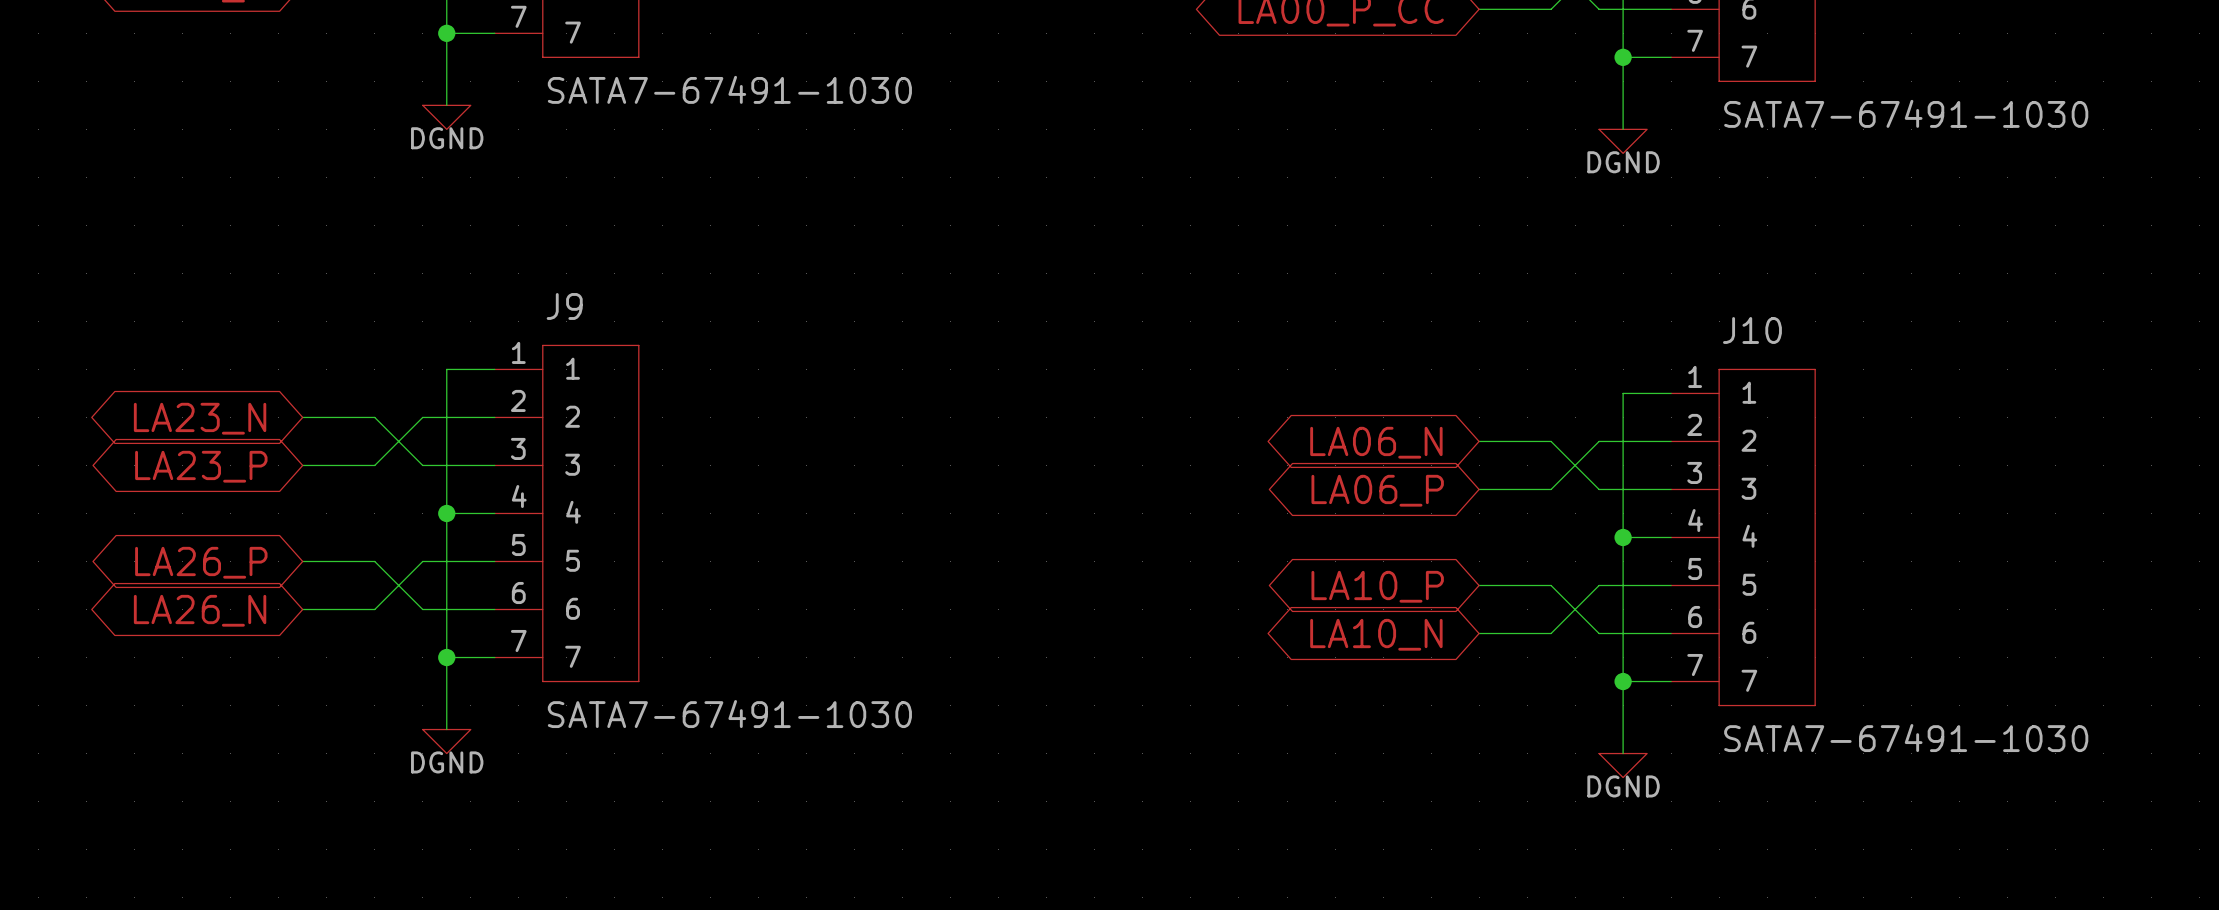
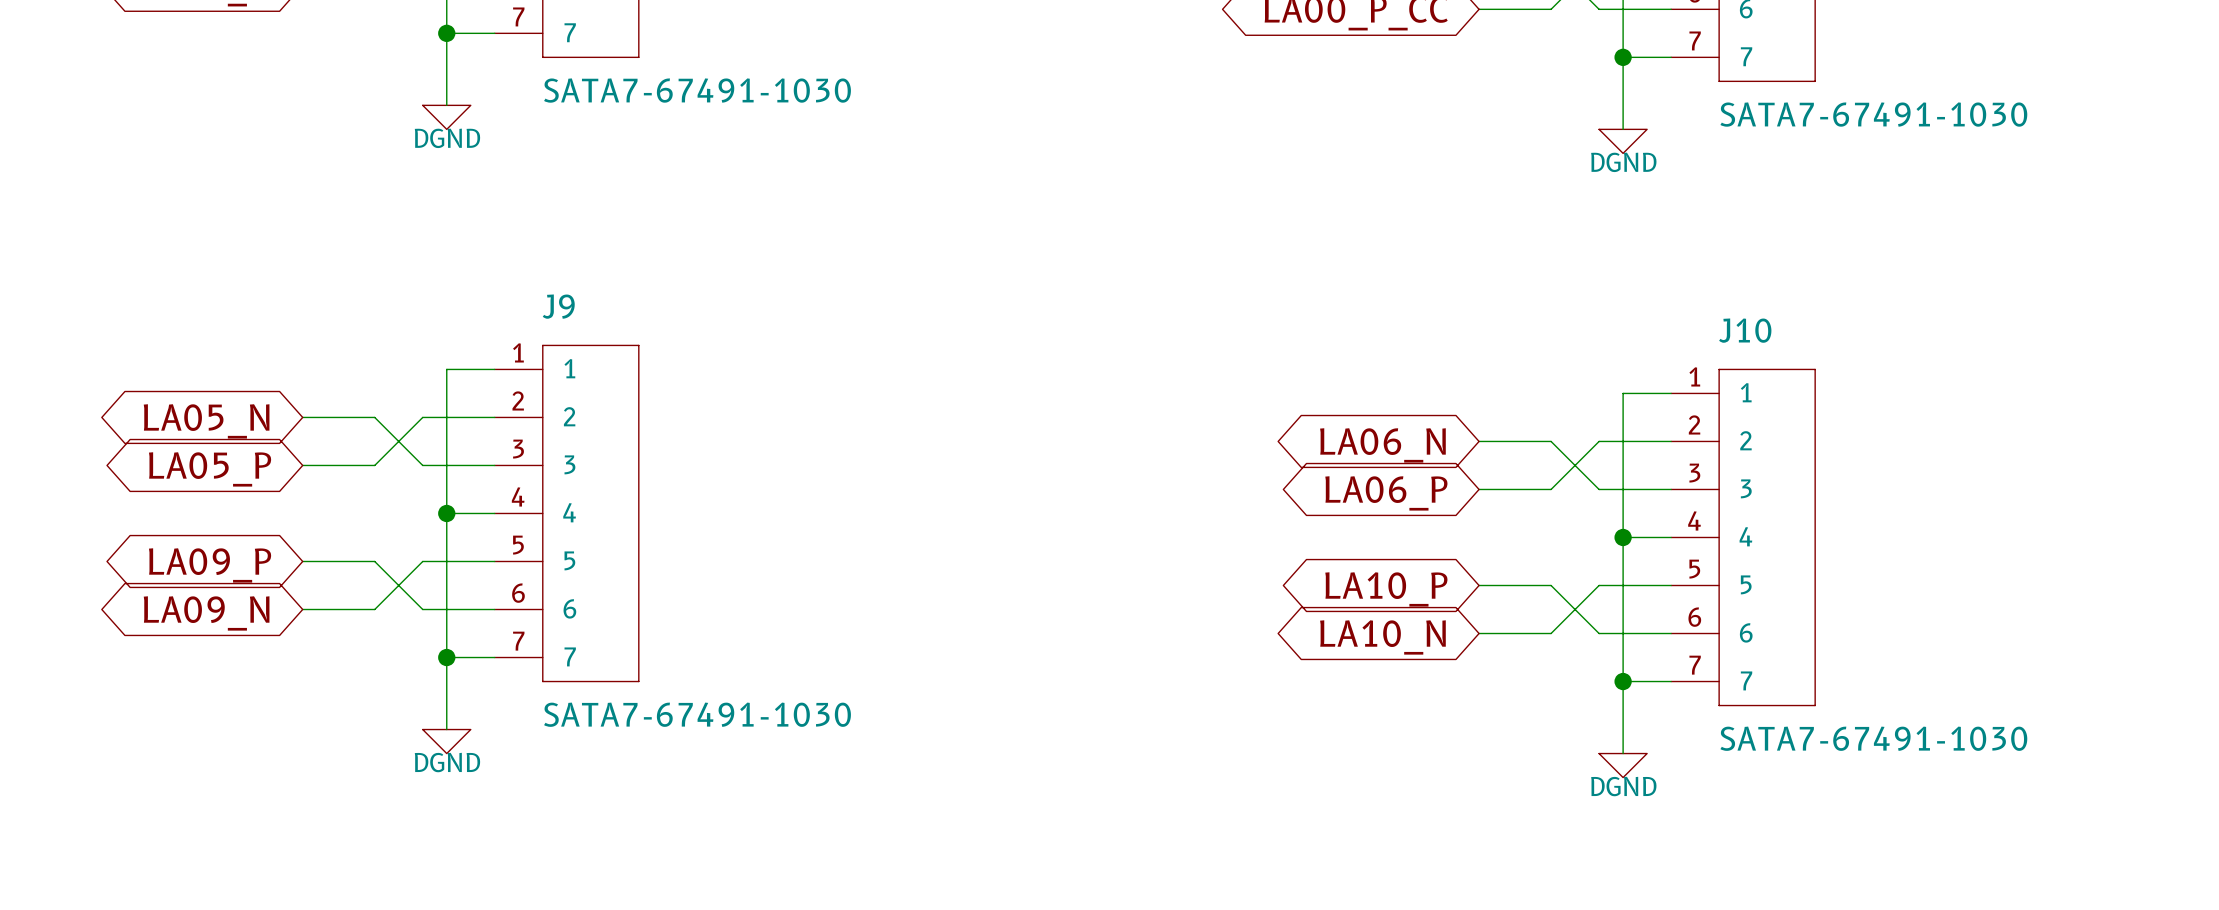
global label: LA23_N (200, 418) -> LA05_N (206, 421)
global label: LA23_P (201, 466) -> LA05_P (210, 469)
global label: LA26_P (201, 562) -> LA09_P (210, 565)
global label: LA26_N (200, 610) -> LA09_N (206, 613)

